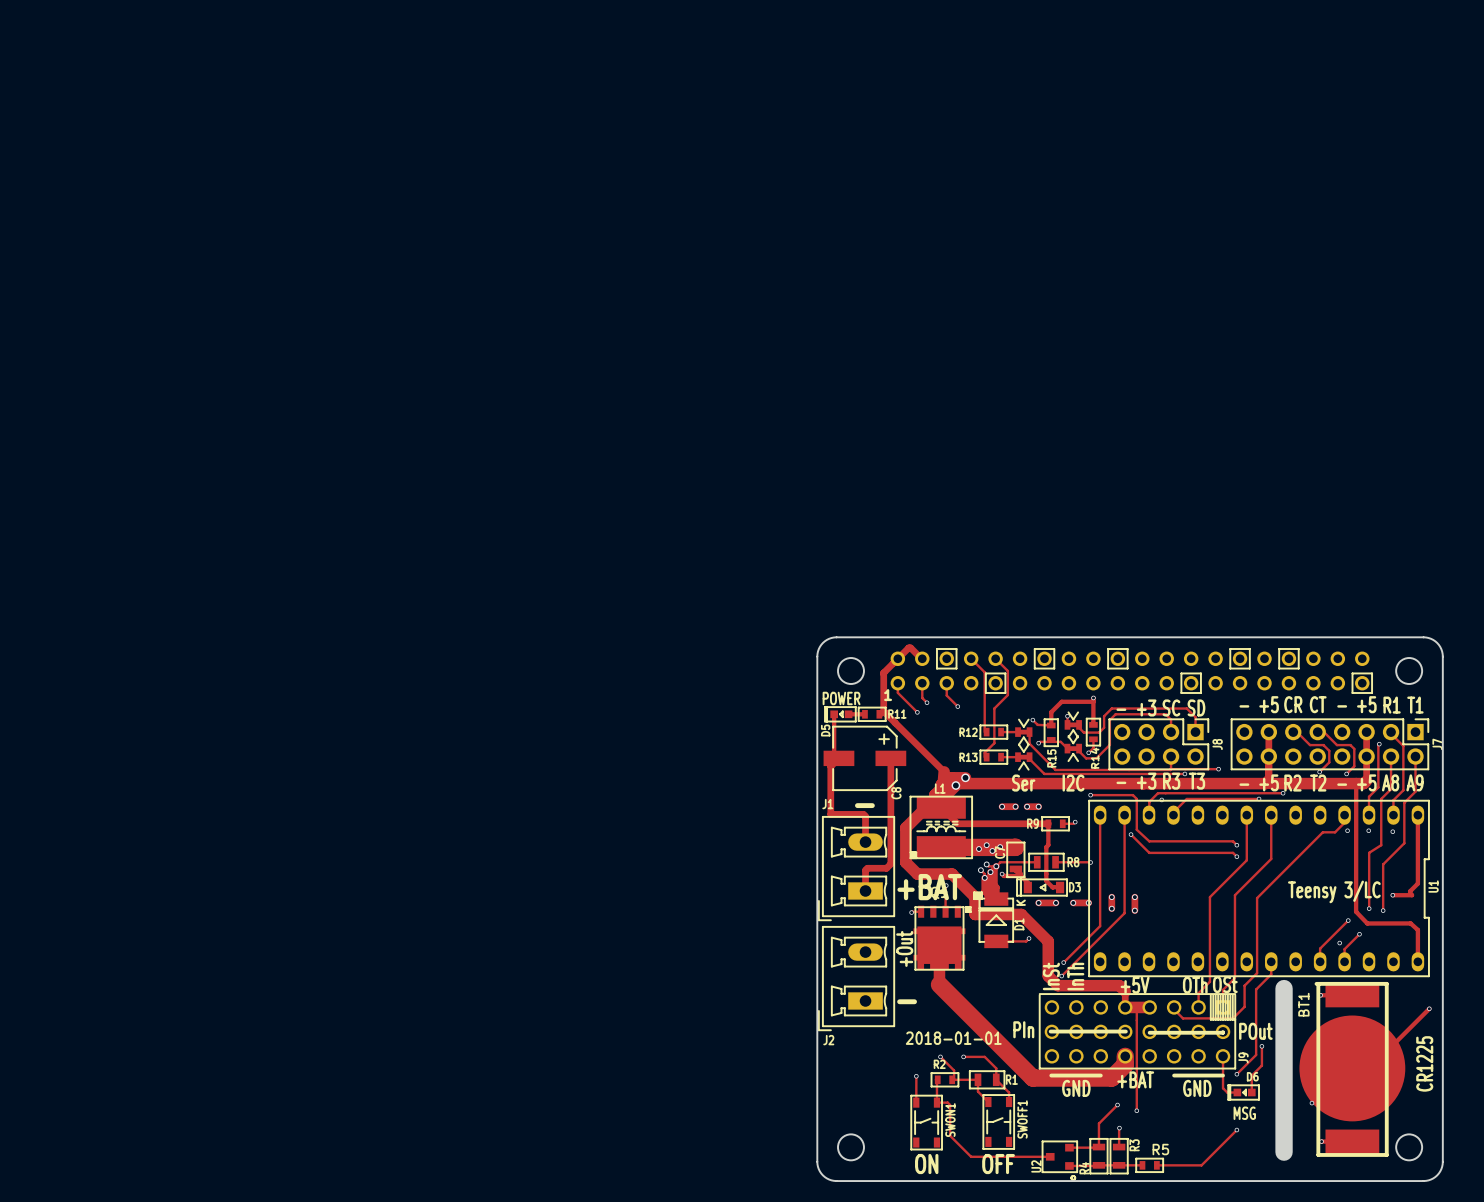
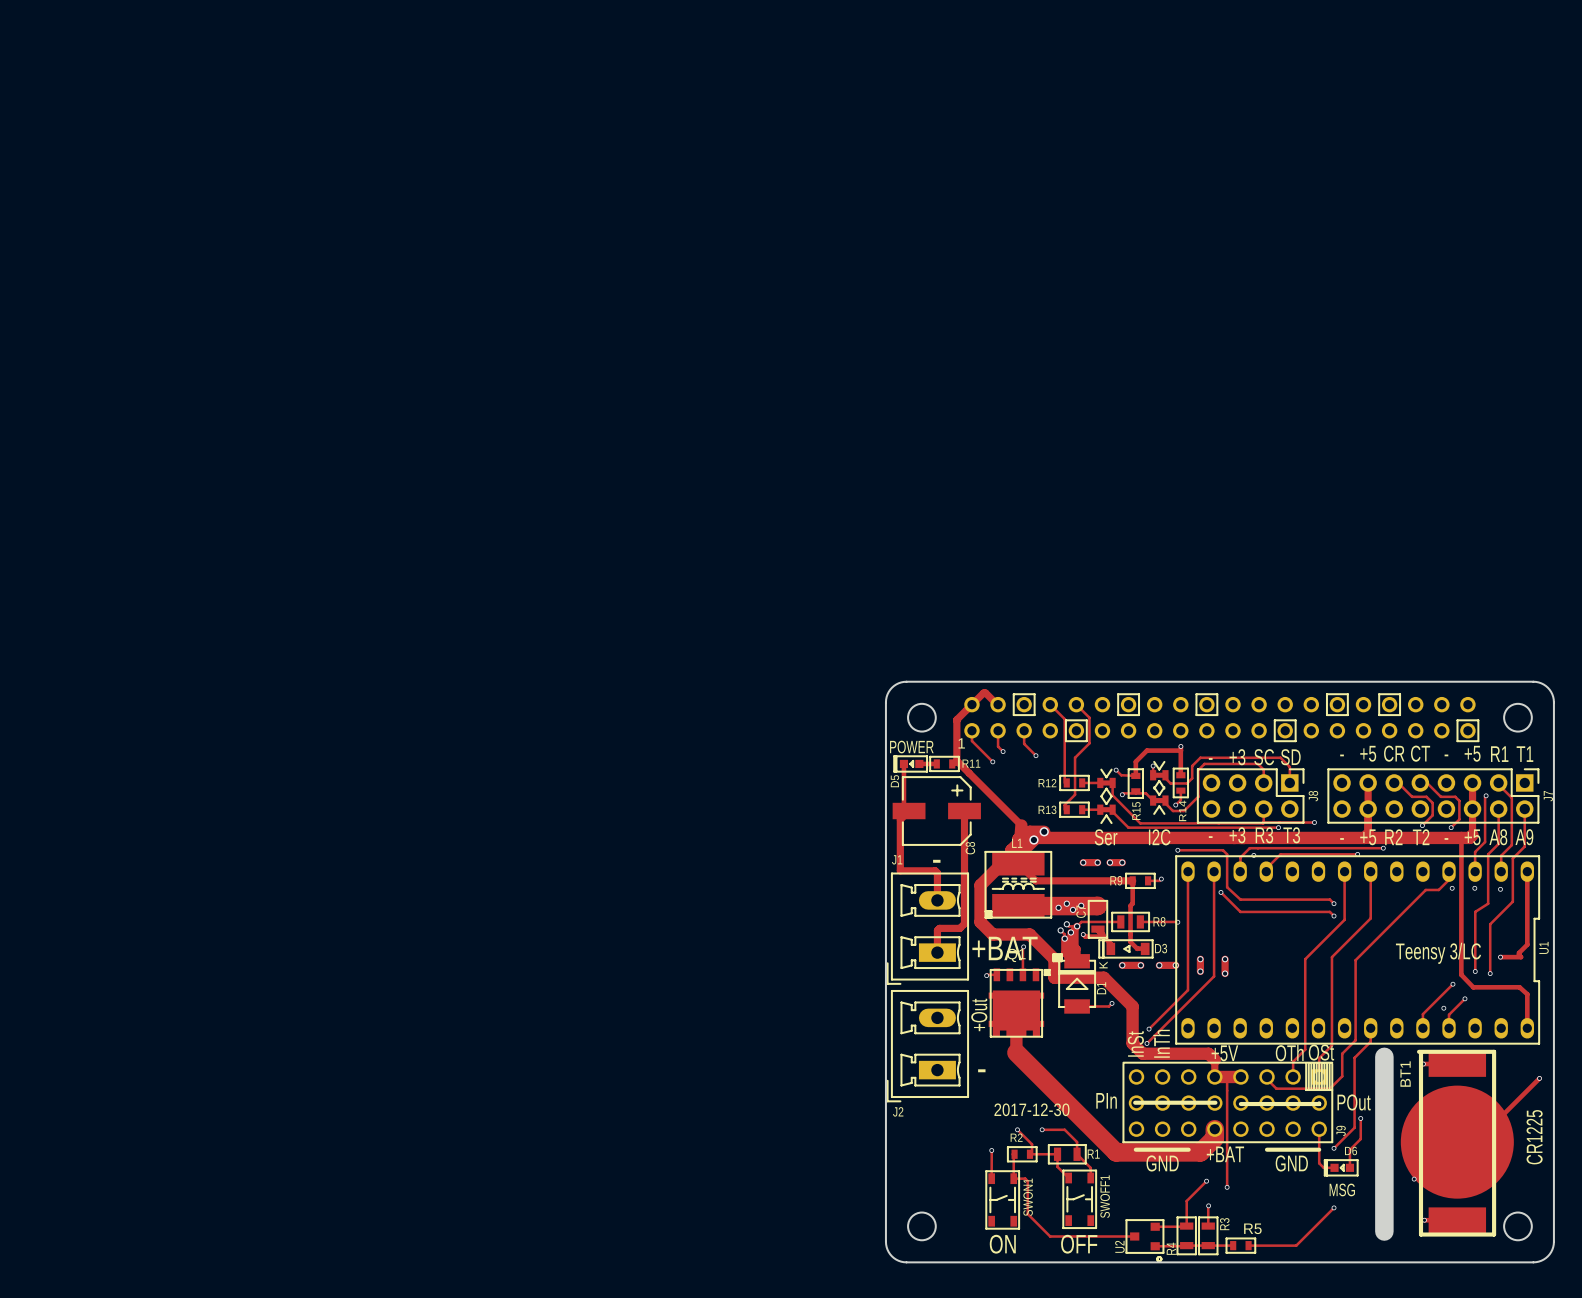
text: 2018-01-01 (953, 1038) -> 2017-12-30 (1031, 1109)

